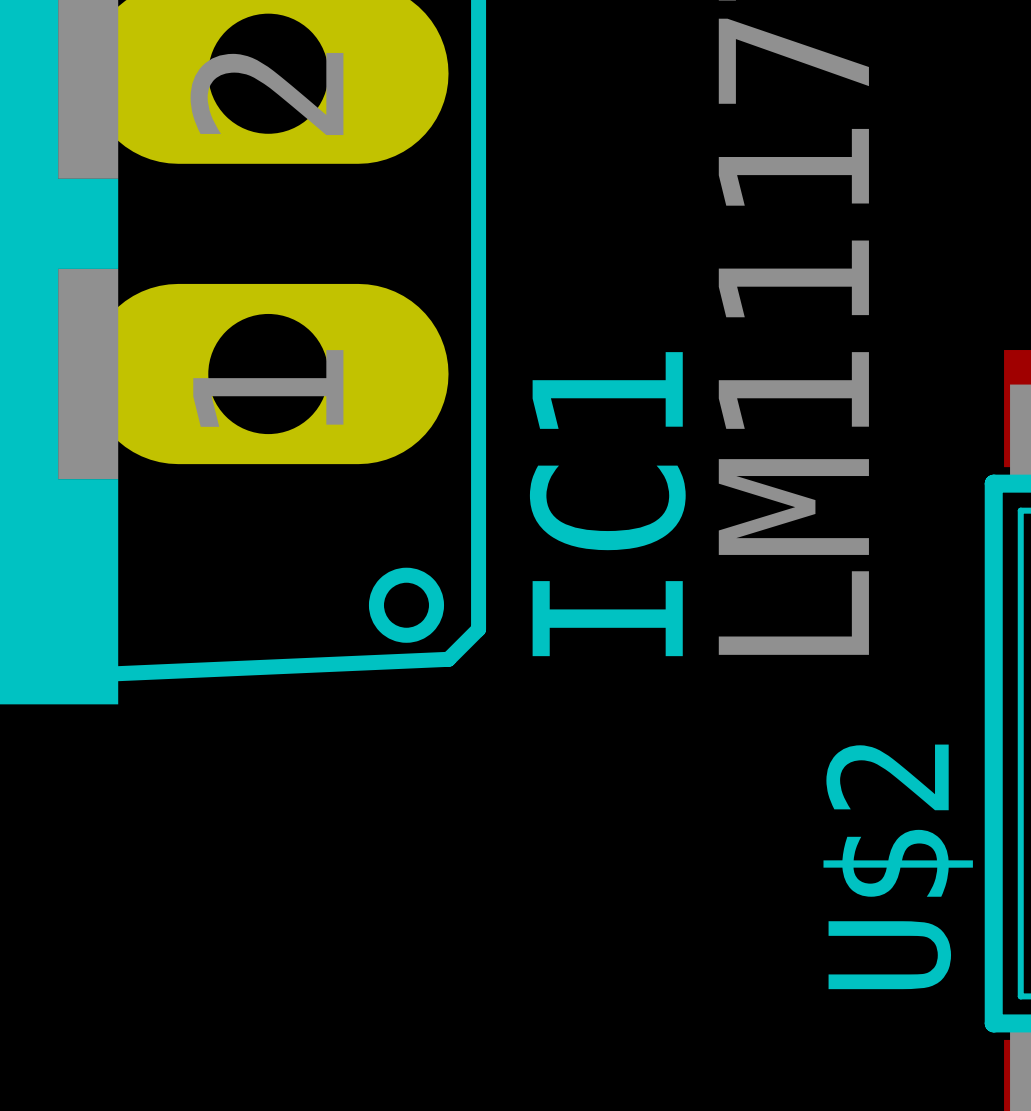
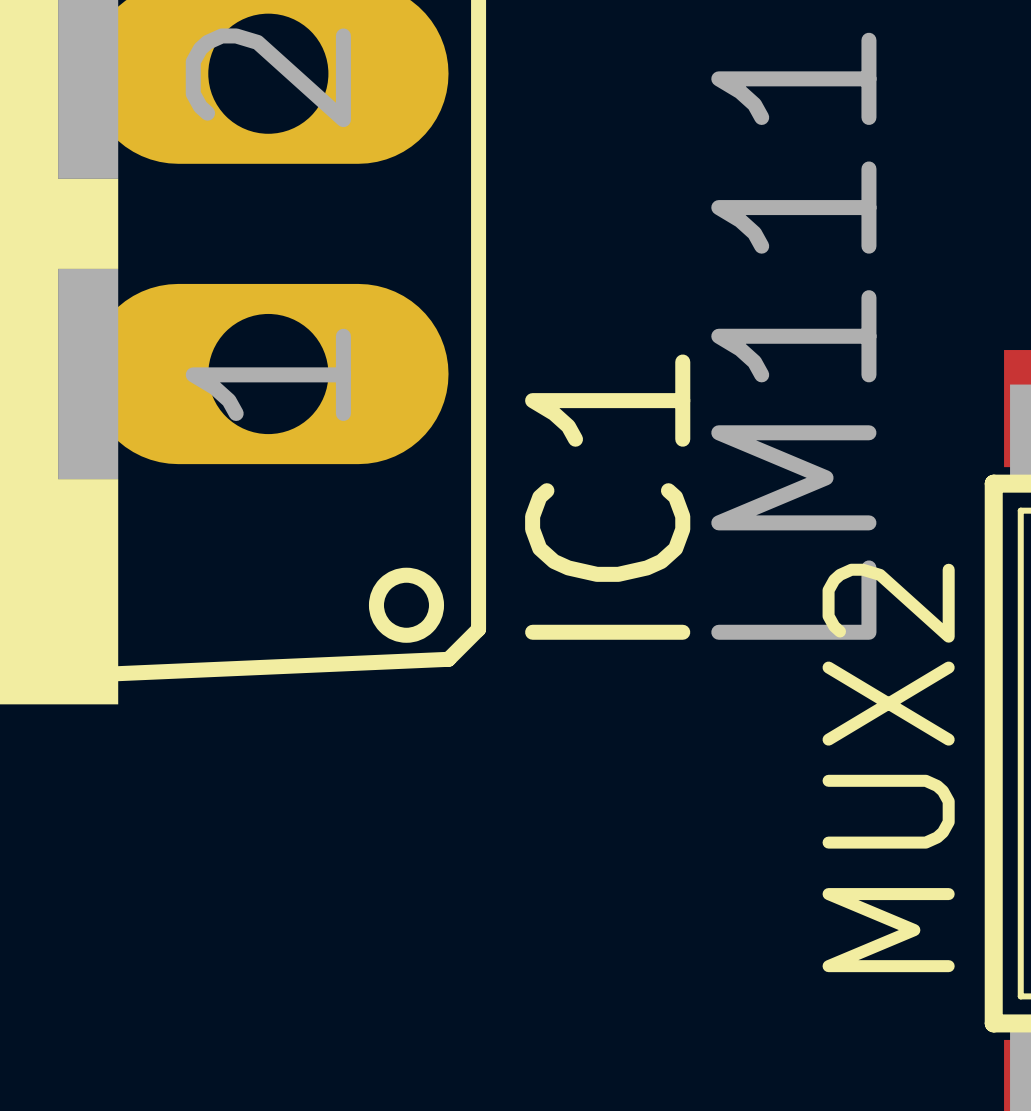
U$2 name: U$2 (898, 866) -> MUX2 (888, 767)

